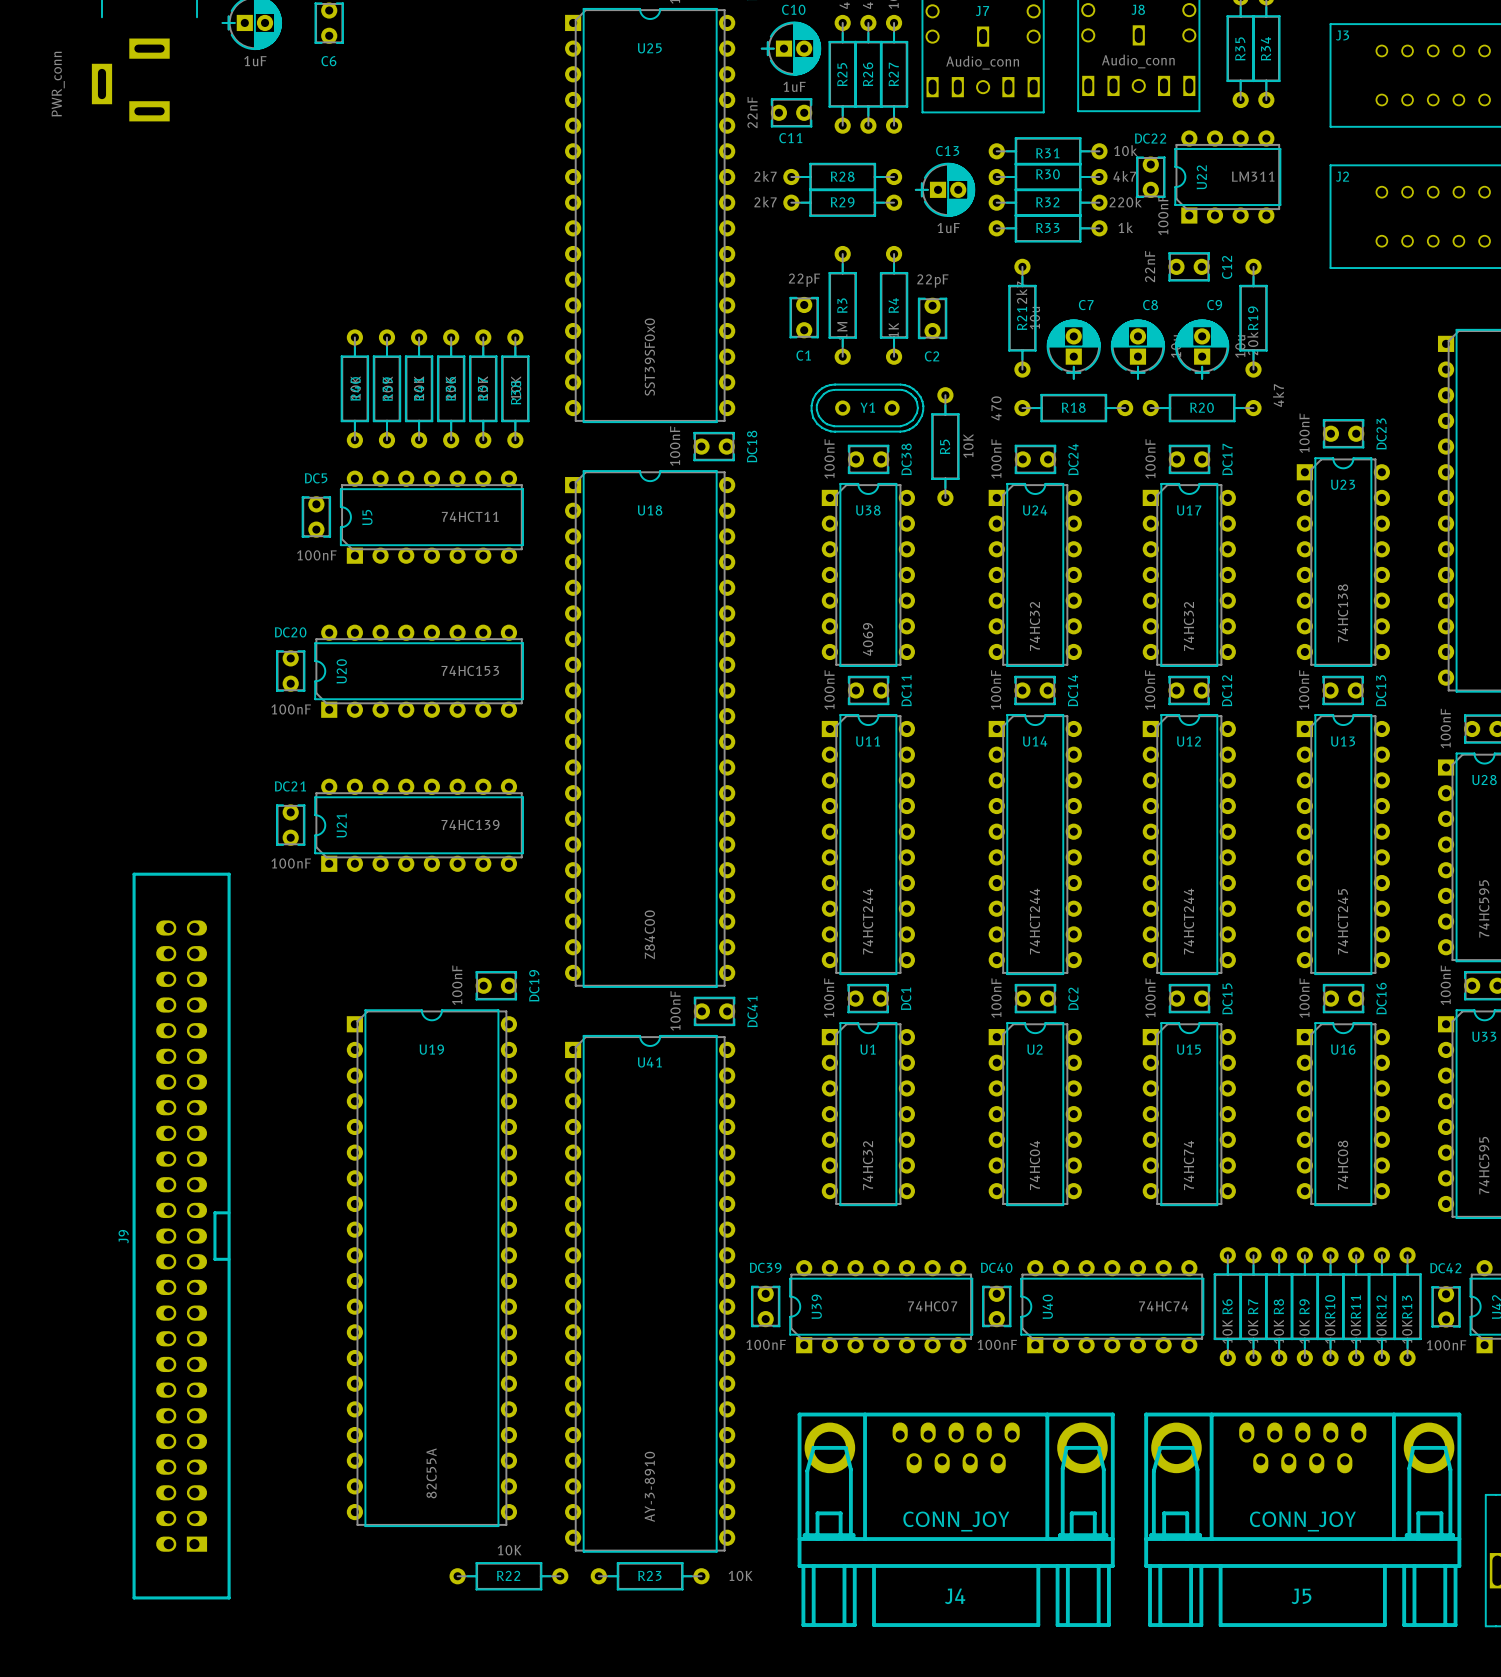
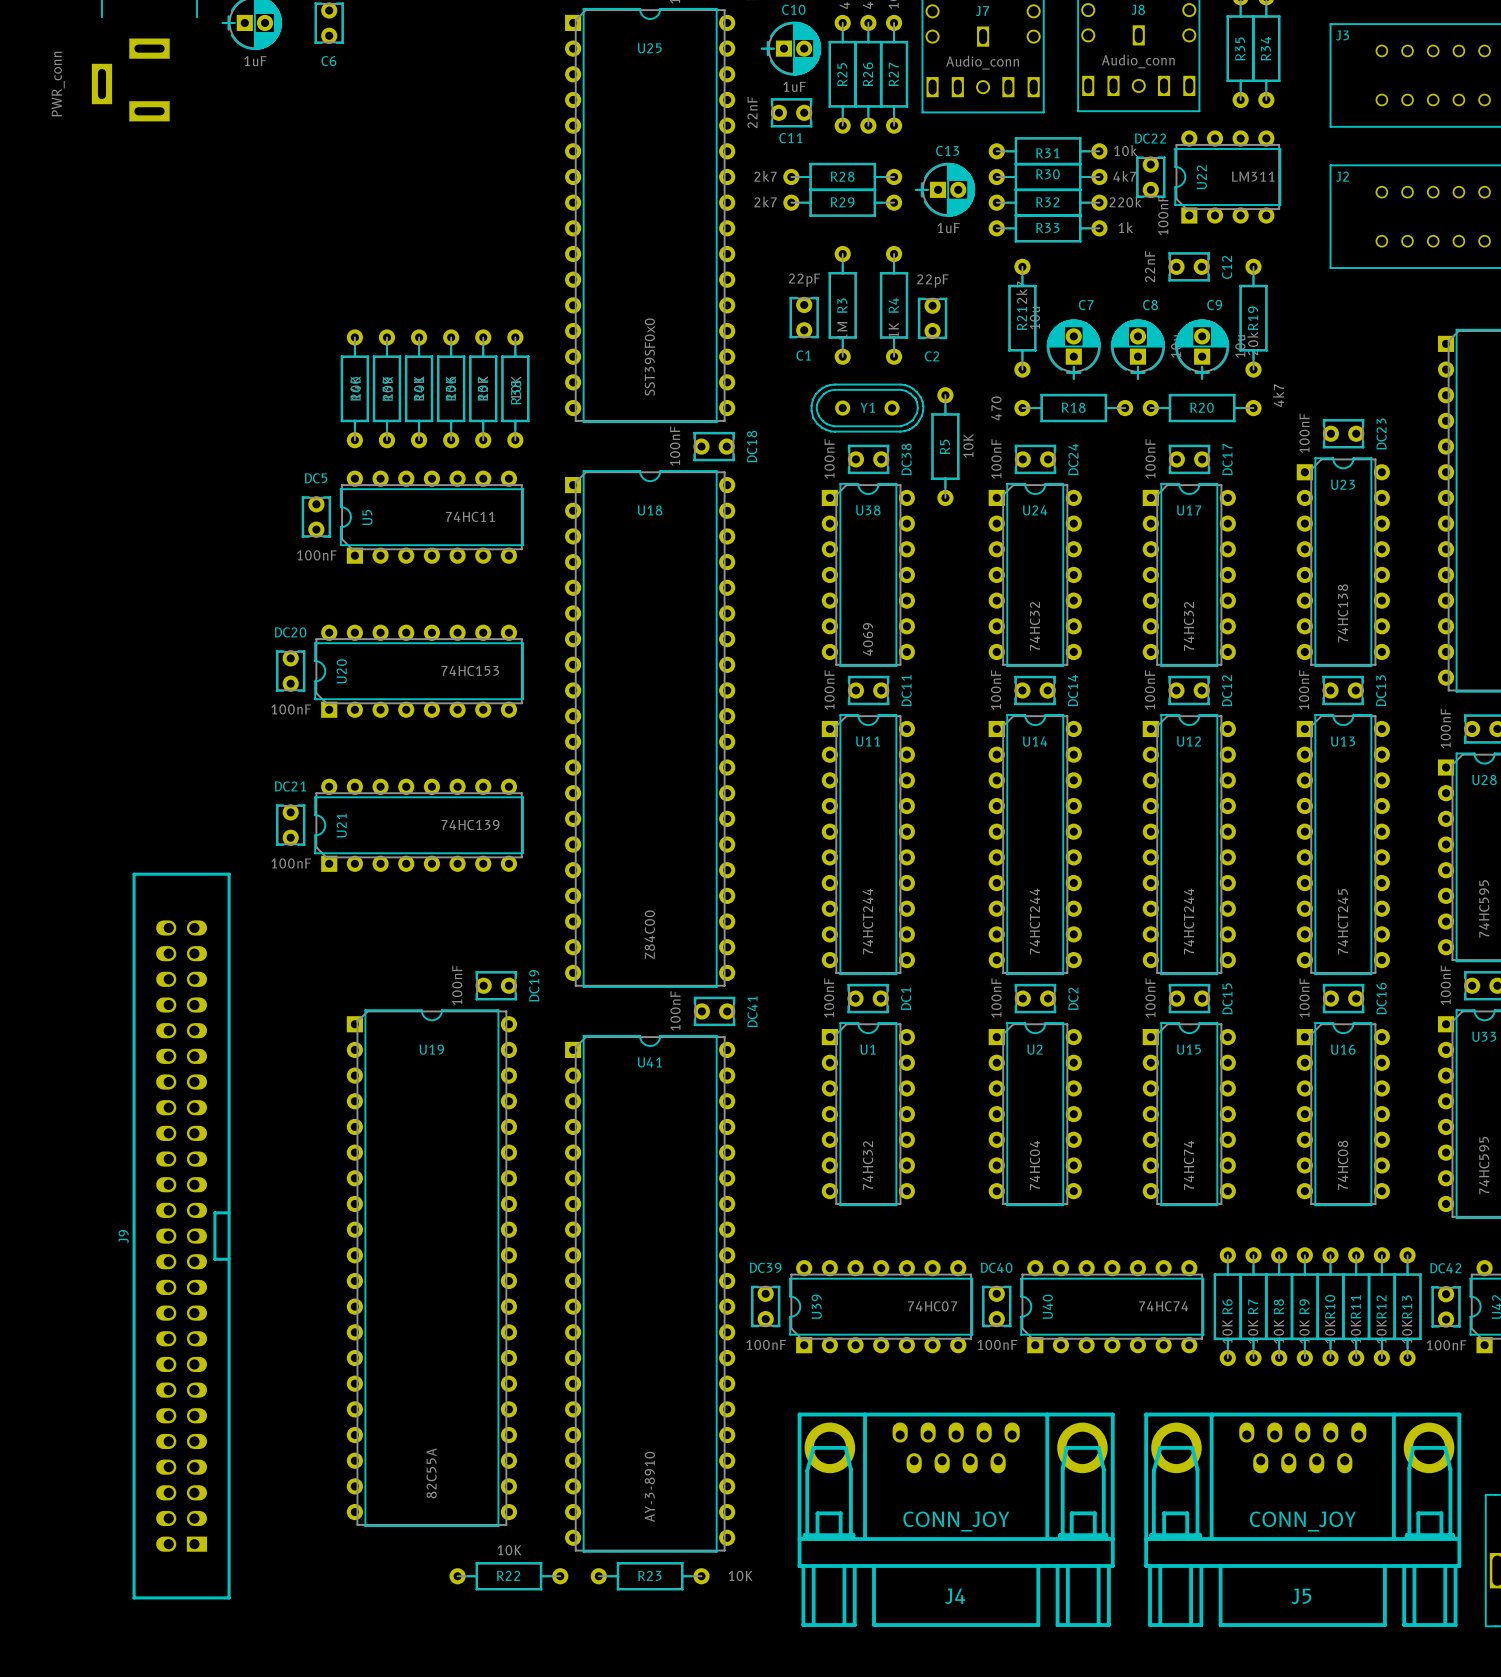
U5 value: 74HCT11 (470, 516) -> 74HC11 (470, 516)

